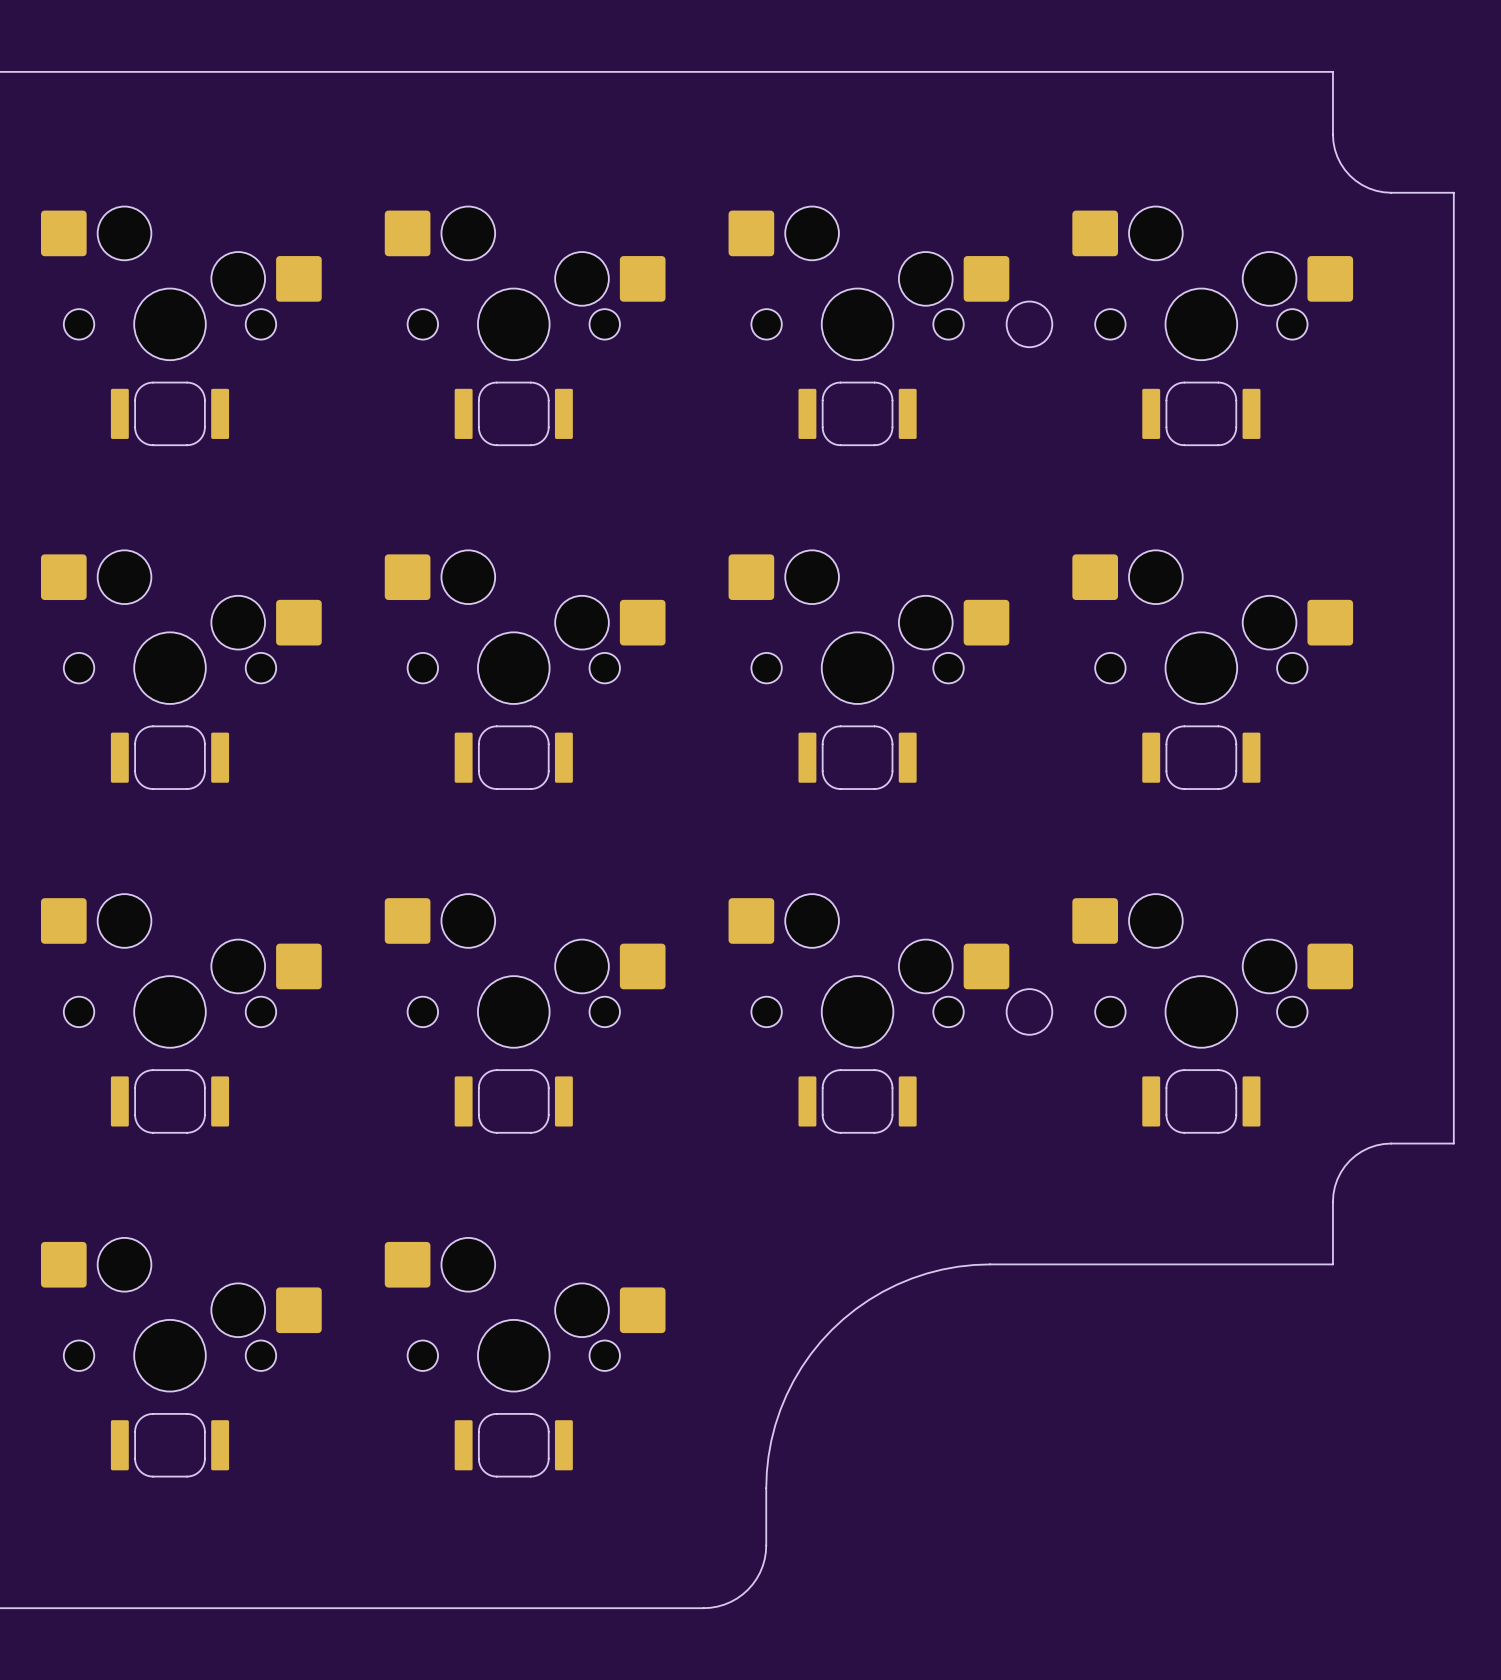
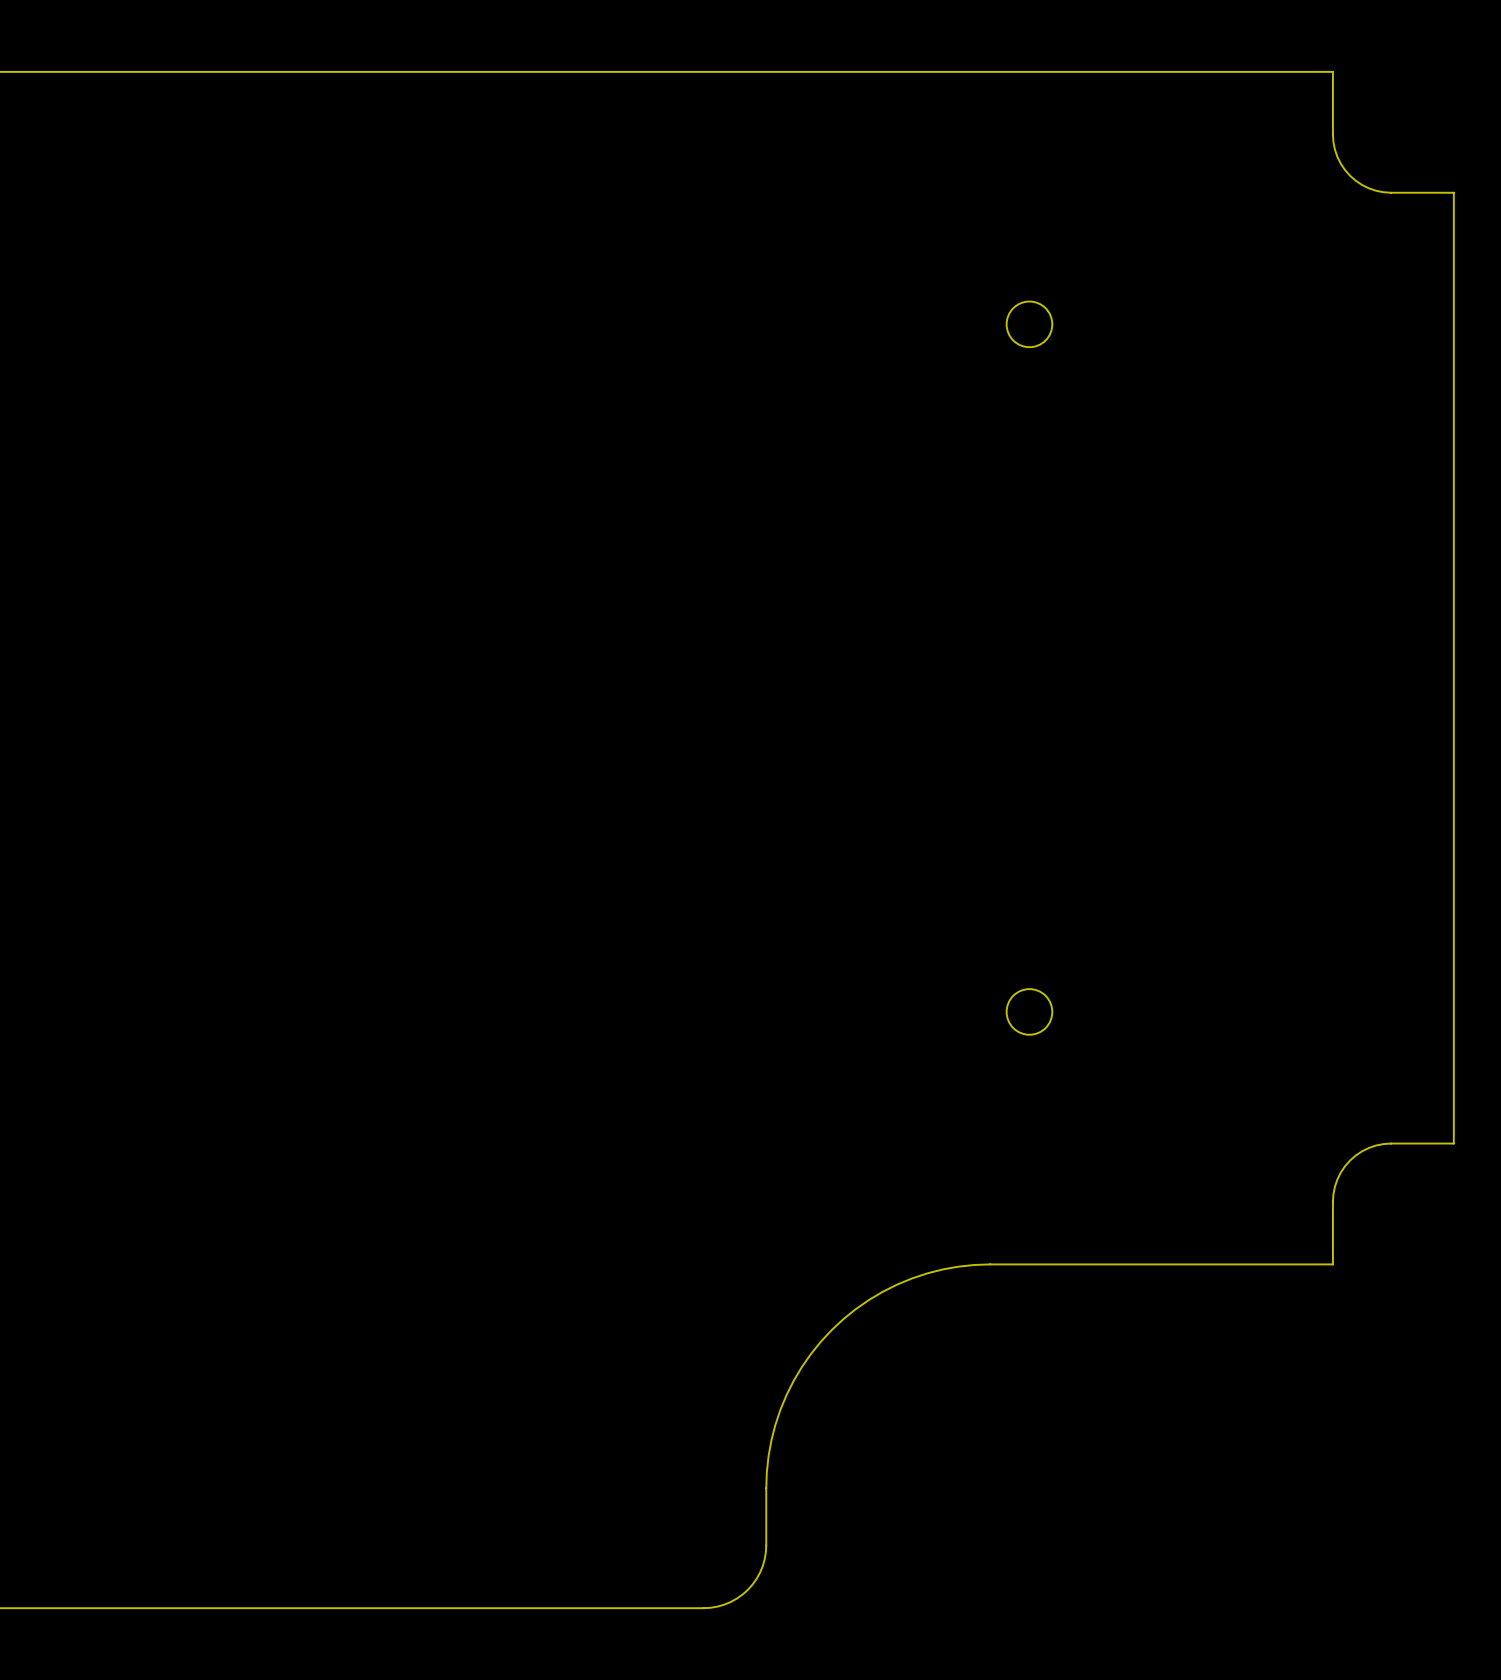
part: (181, 283) -> none
part: (525, 283) -> none
part: (868, 283) -> none
part: (1212, 283) -> none
part: (169, 413) -> none
part: (513, 413) -> none
part: (857, 413) -> none
part: (1201, 413) -> none
part: (181, 627) -> none
part: (525, 627) -> none
part: (868, 627) -> none
part: (1212, 627) -> none
part: (169, 757) -> none
part: (513, 757) -> none
part: (857, 757) -> none
part: (1201, 757) -> none
part: (181, 970) -> none
part: (525, 970) -> none
part: (868, 970) -> none
part: (1212, 970) -> none
part: (169, 1101) -> none
part: (513, 1101) -> none
part: (857, 1101) -> none
part: (1201, 1101) -> none
part: (181, 1314) -> none
part: (525, 1314) -> none
part: (169, 1445) -> none
part: (513, 1445) -> none

